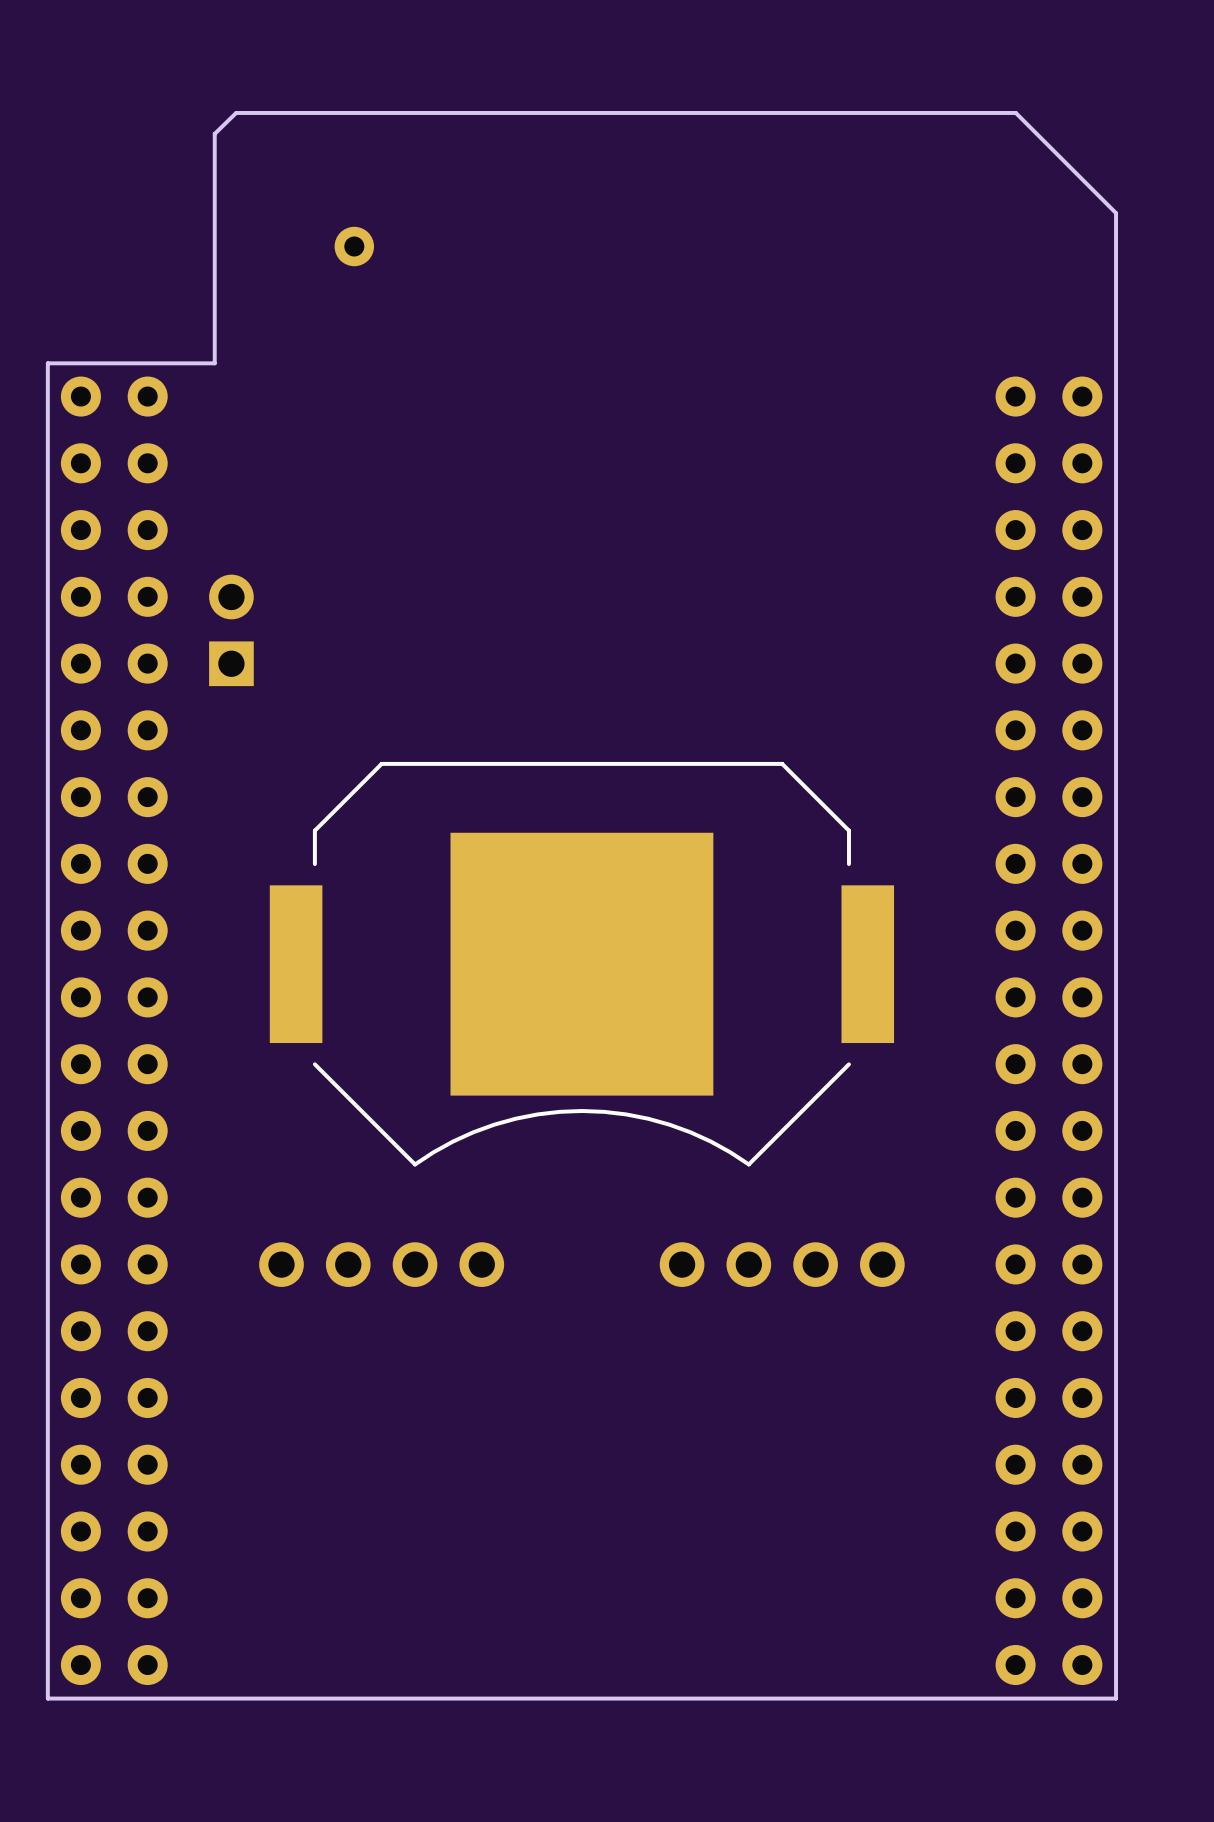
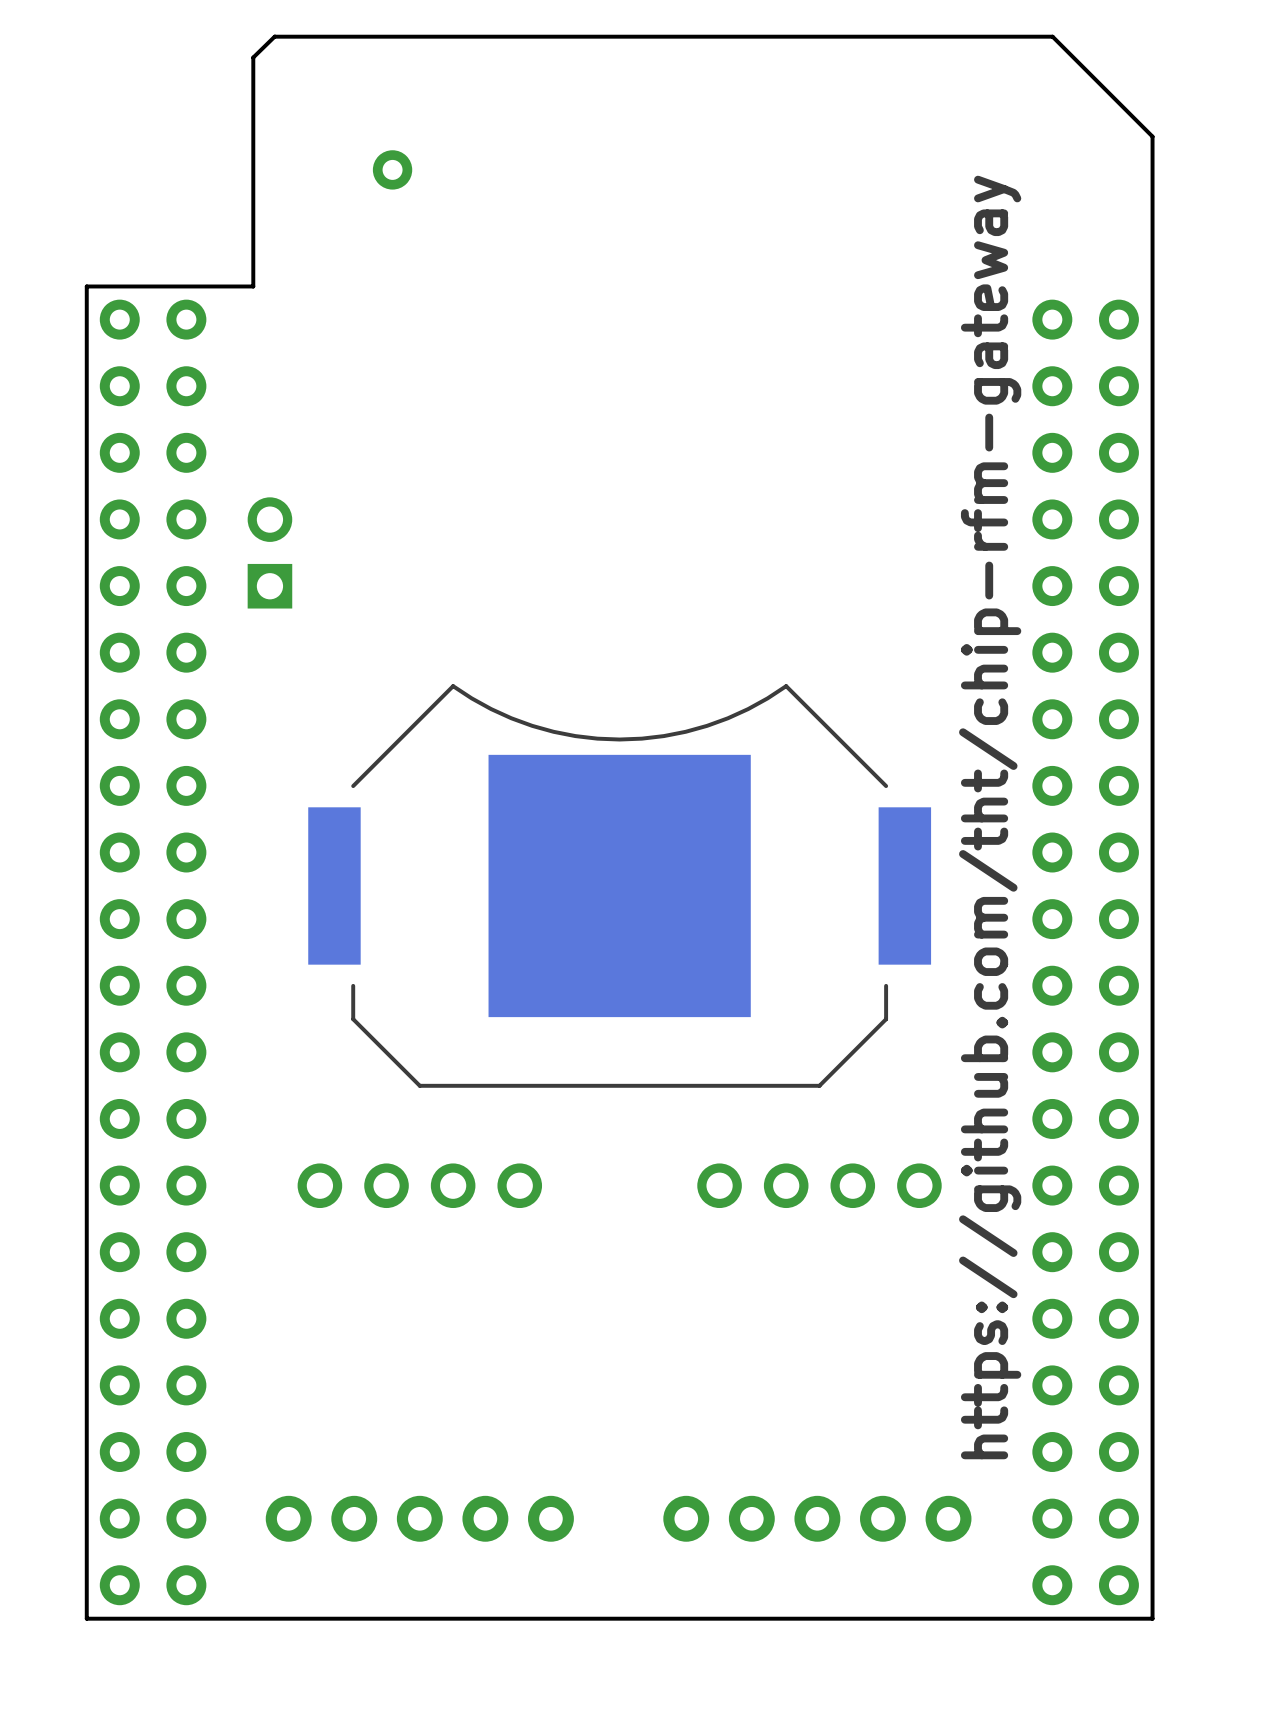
text: none -> https://github.com/tht/chip-rfm-gateway (990, 817)
part rotation: 0° (581, 964) -> 180° (619, 885)
part: none -> (419, 1518)
part: none -> (817, 1518)

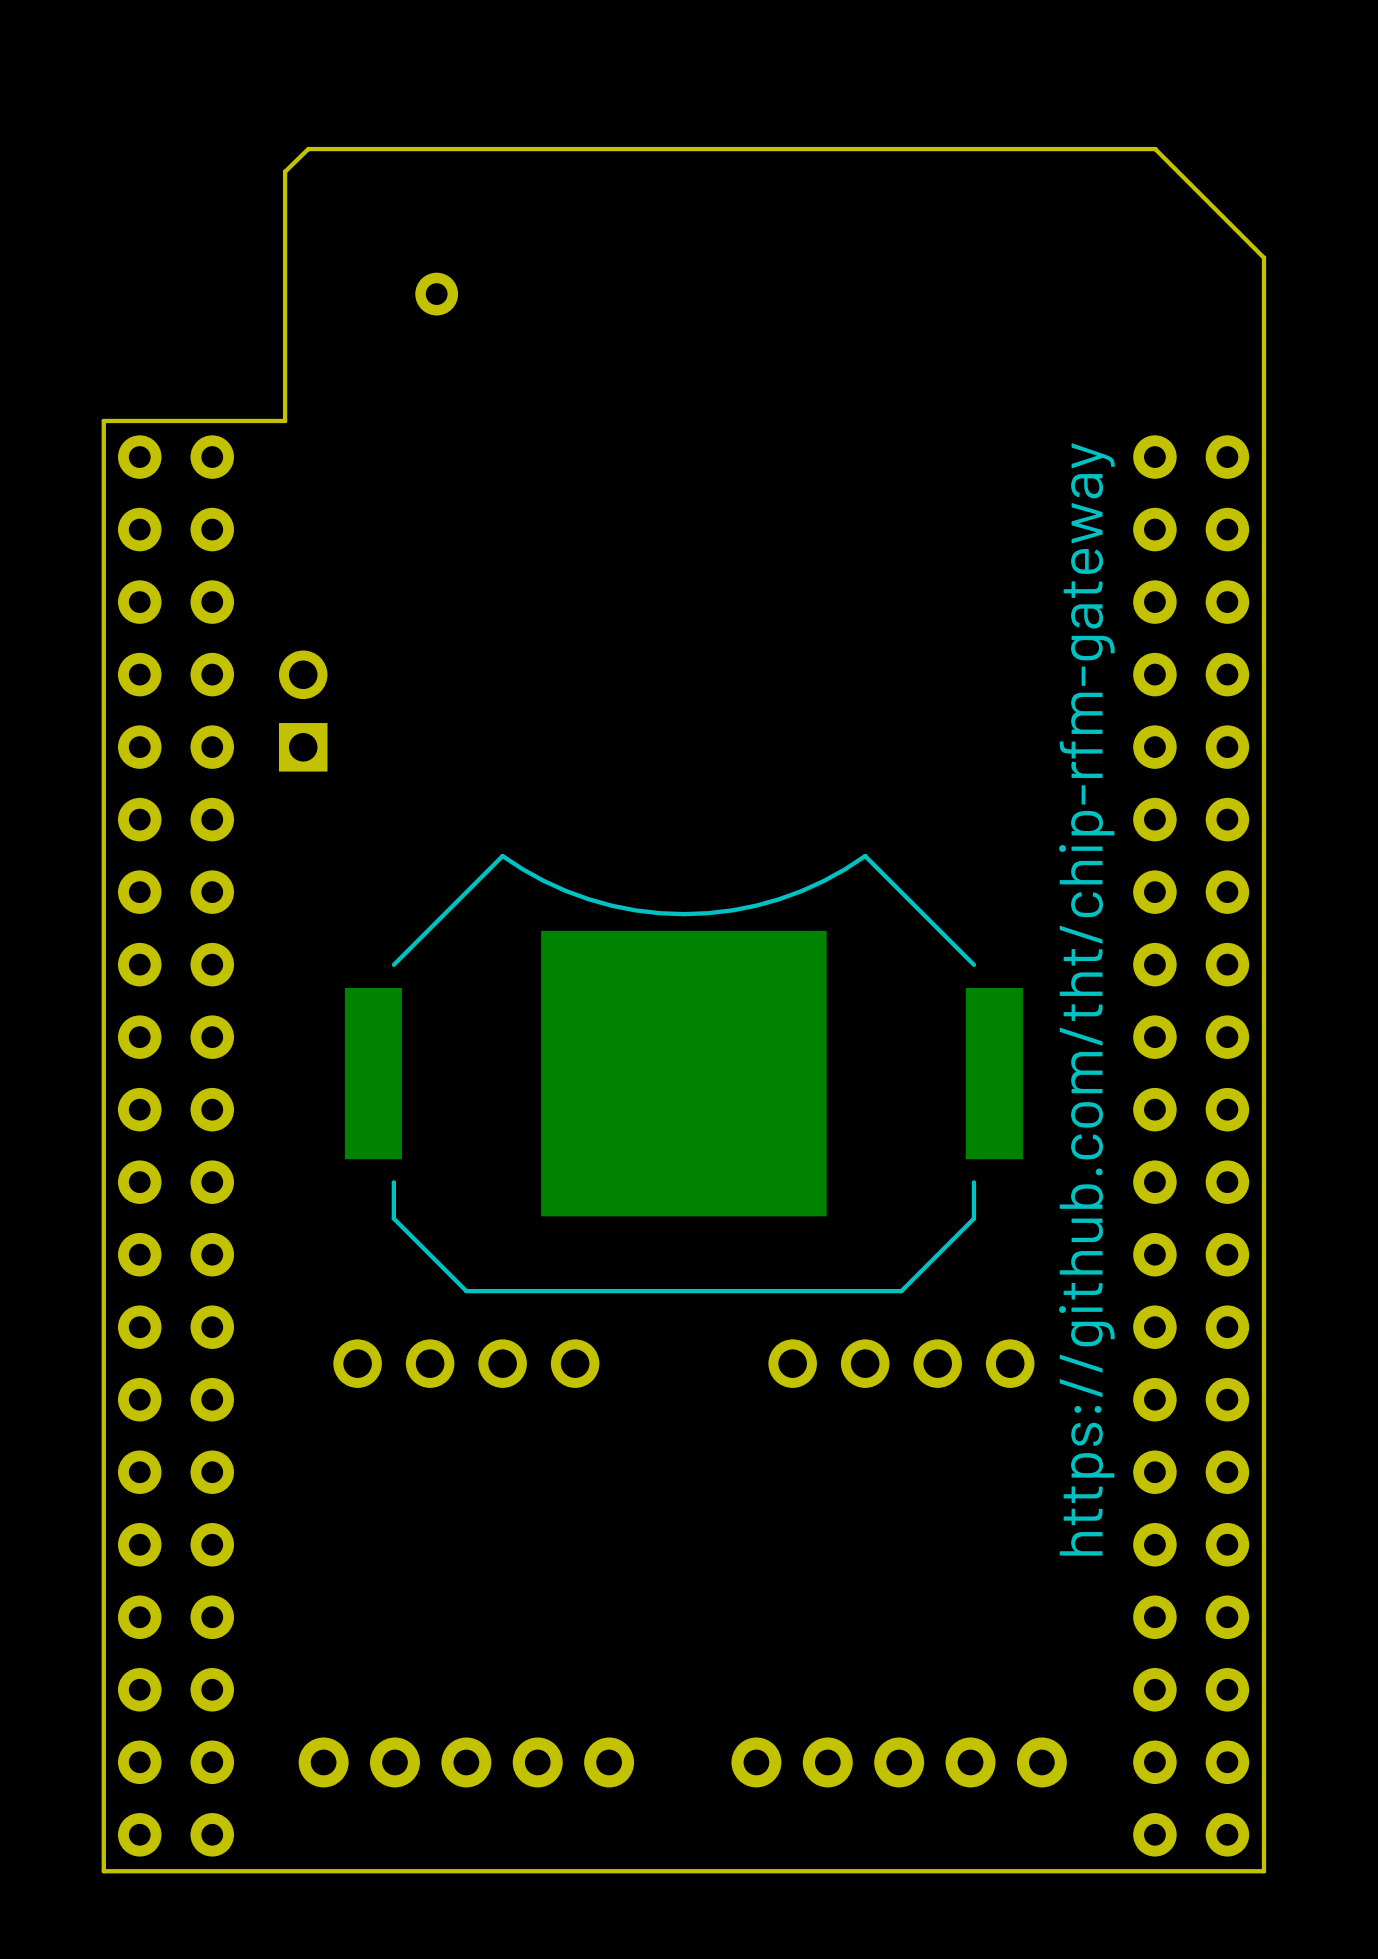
part position: (419, 1185) -> (466, 1363)
part position: (819, 1185) -> (901, 1363)

